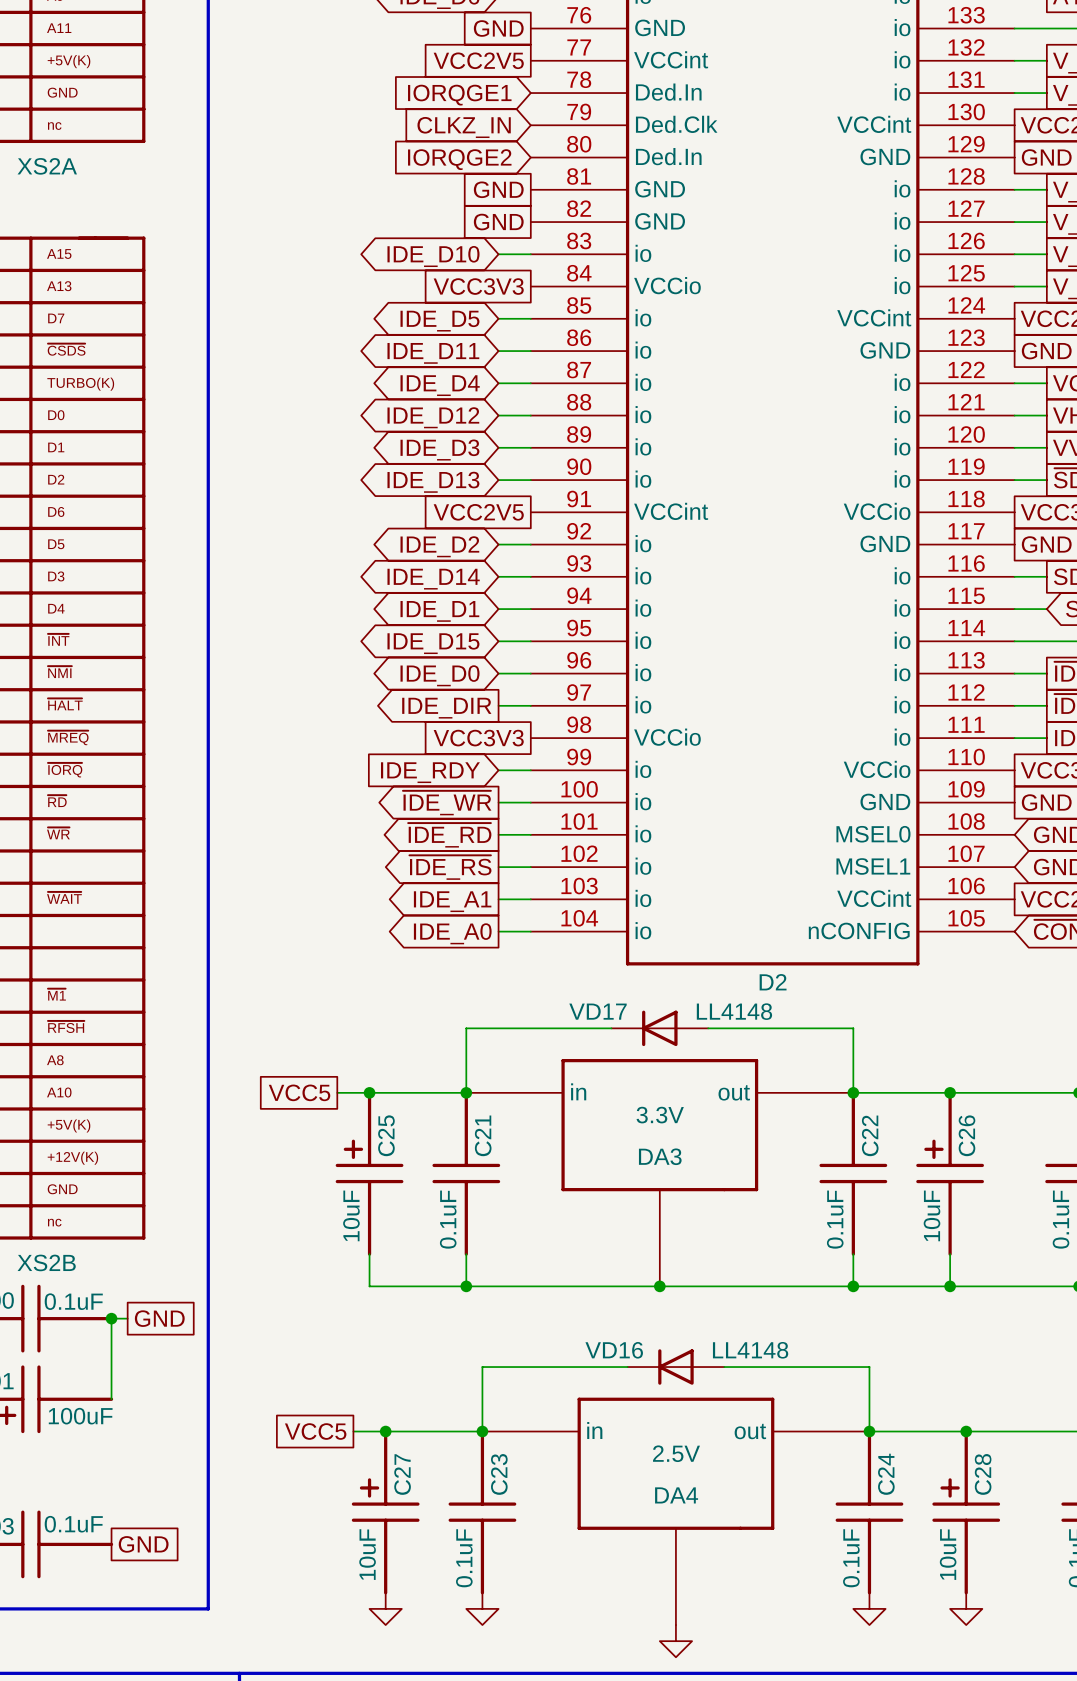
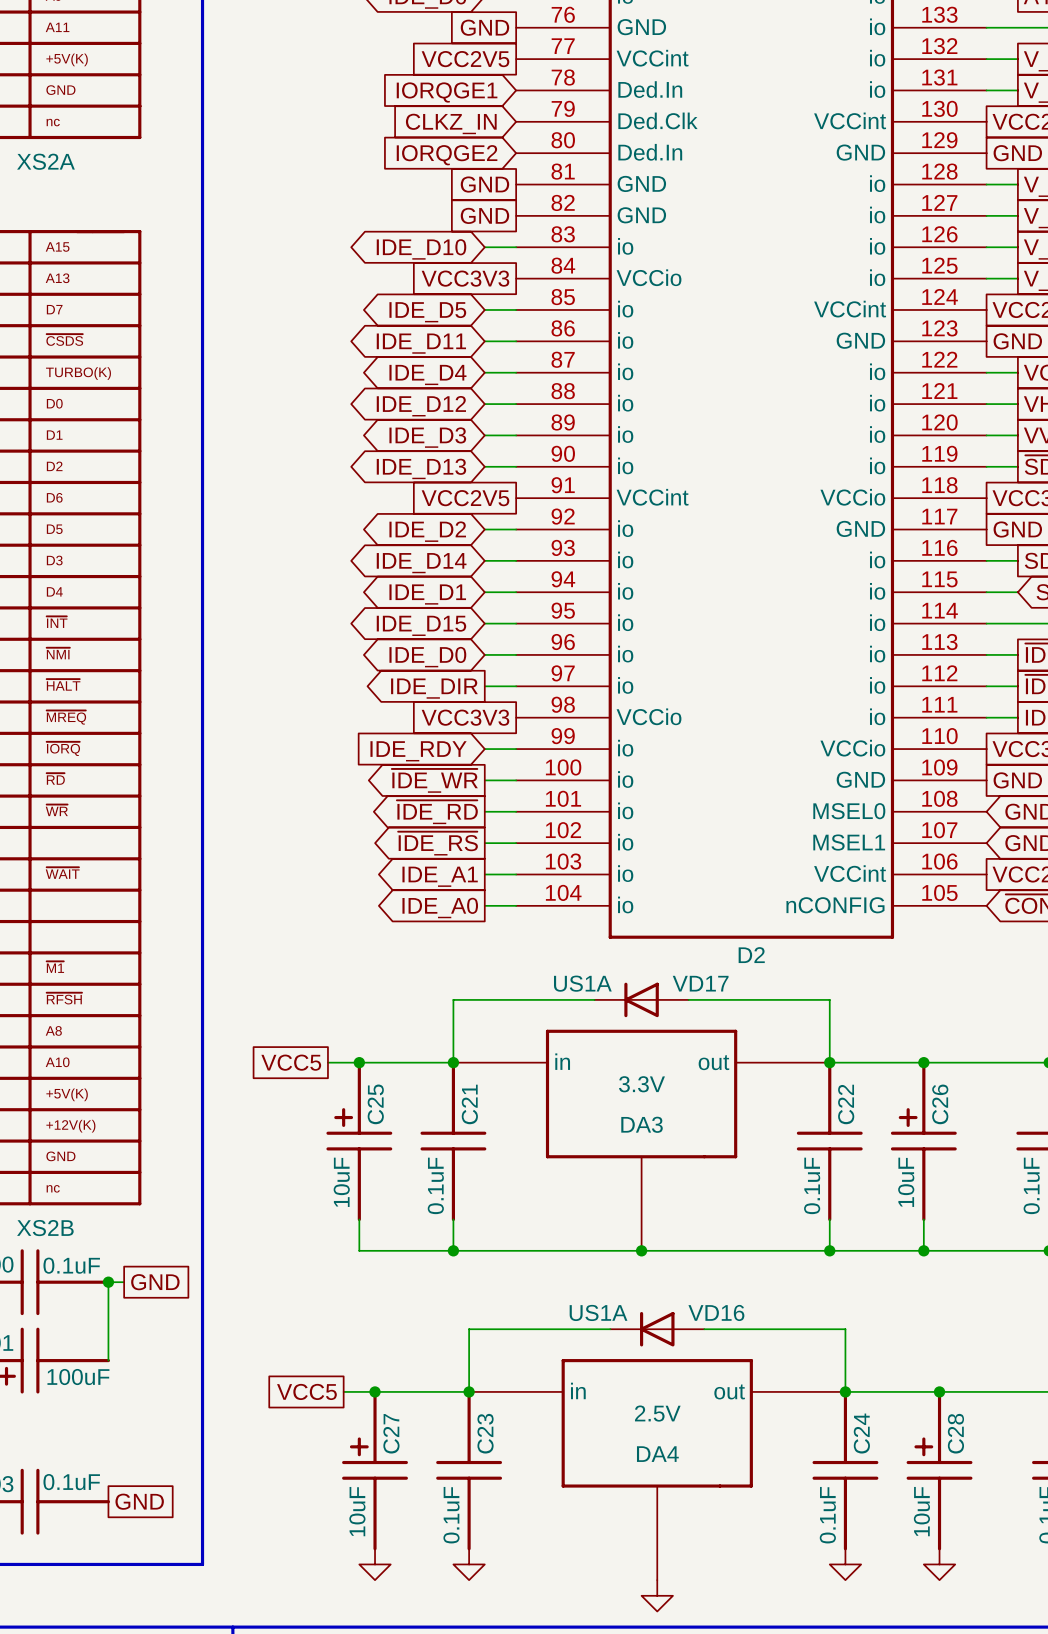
VD17 name position: VD17 (598, 1011) -> VD17 (700, 983)
VD17 value: LL4148 (734, 1011) -> US1A (582, 983)
VD16 name position: VD16 (614, 1350) -> VD16 (716, 1312)
VD16 value: LL4148 (750, 1350) -> US1A (598, 1312)

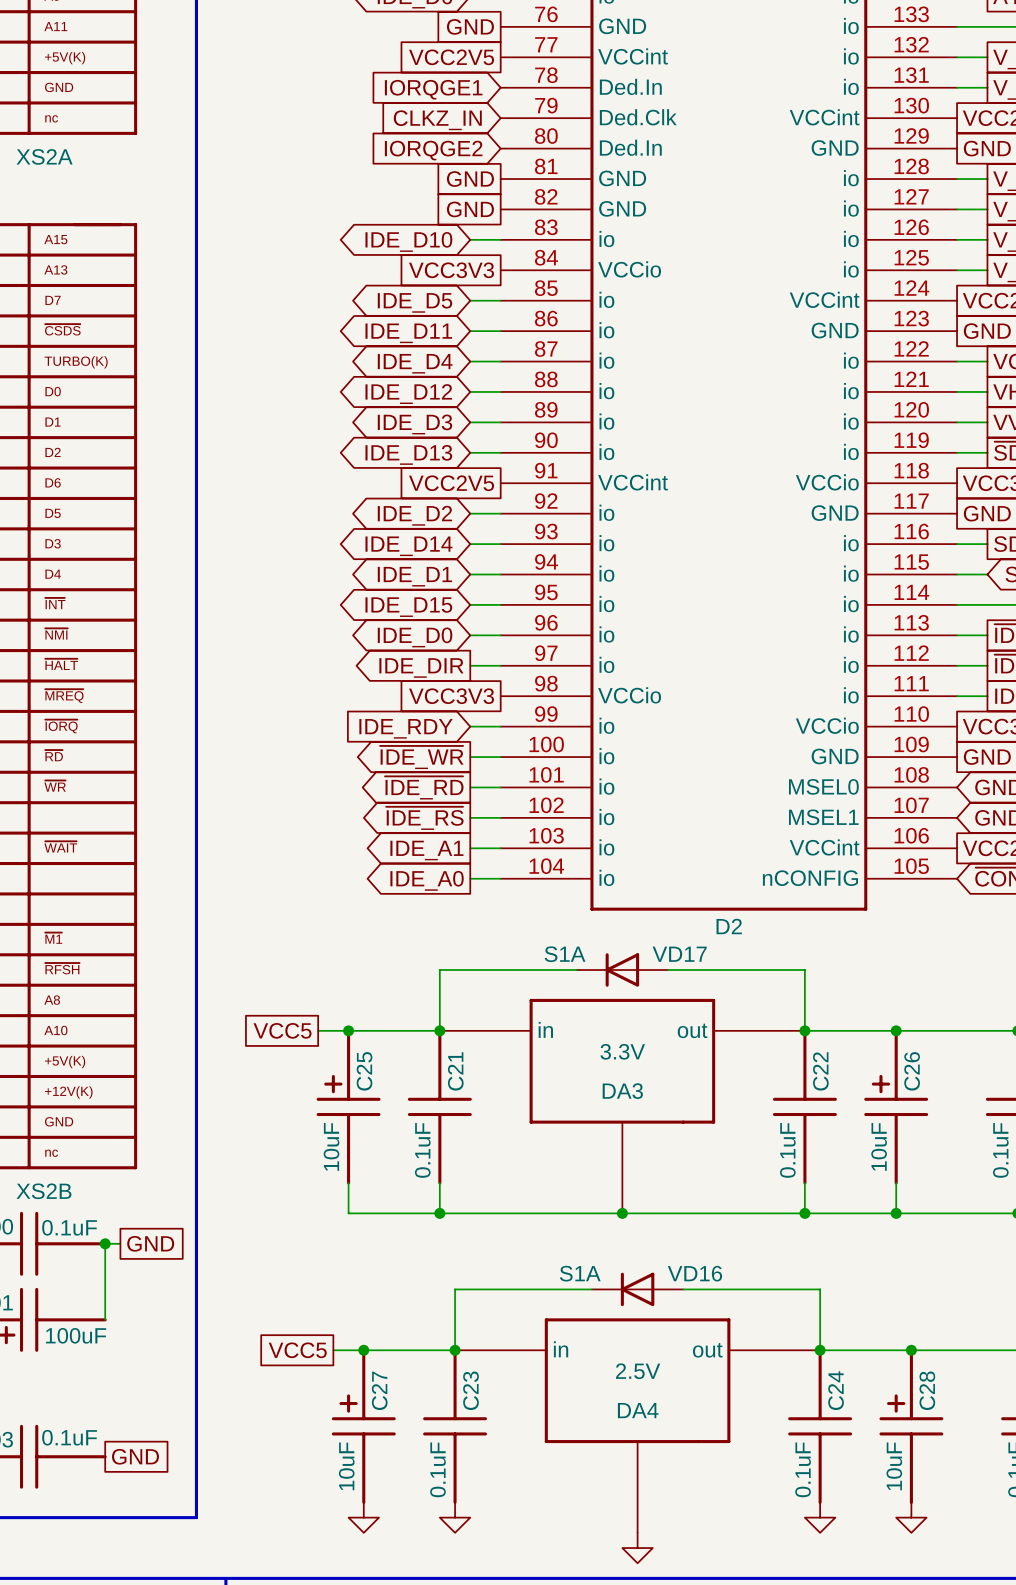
VD17 value: US1A (582, 983) -> S1A (565, 954)
VD16 value: US1A (598, 1312) -> S1A (580, 1273)

